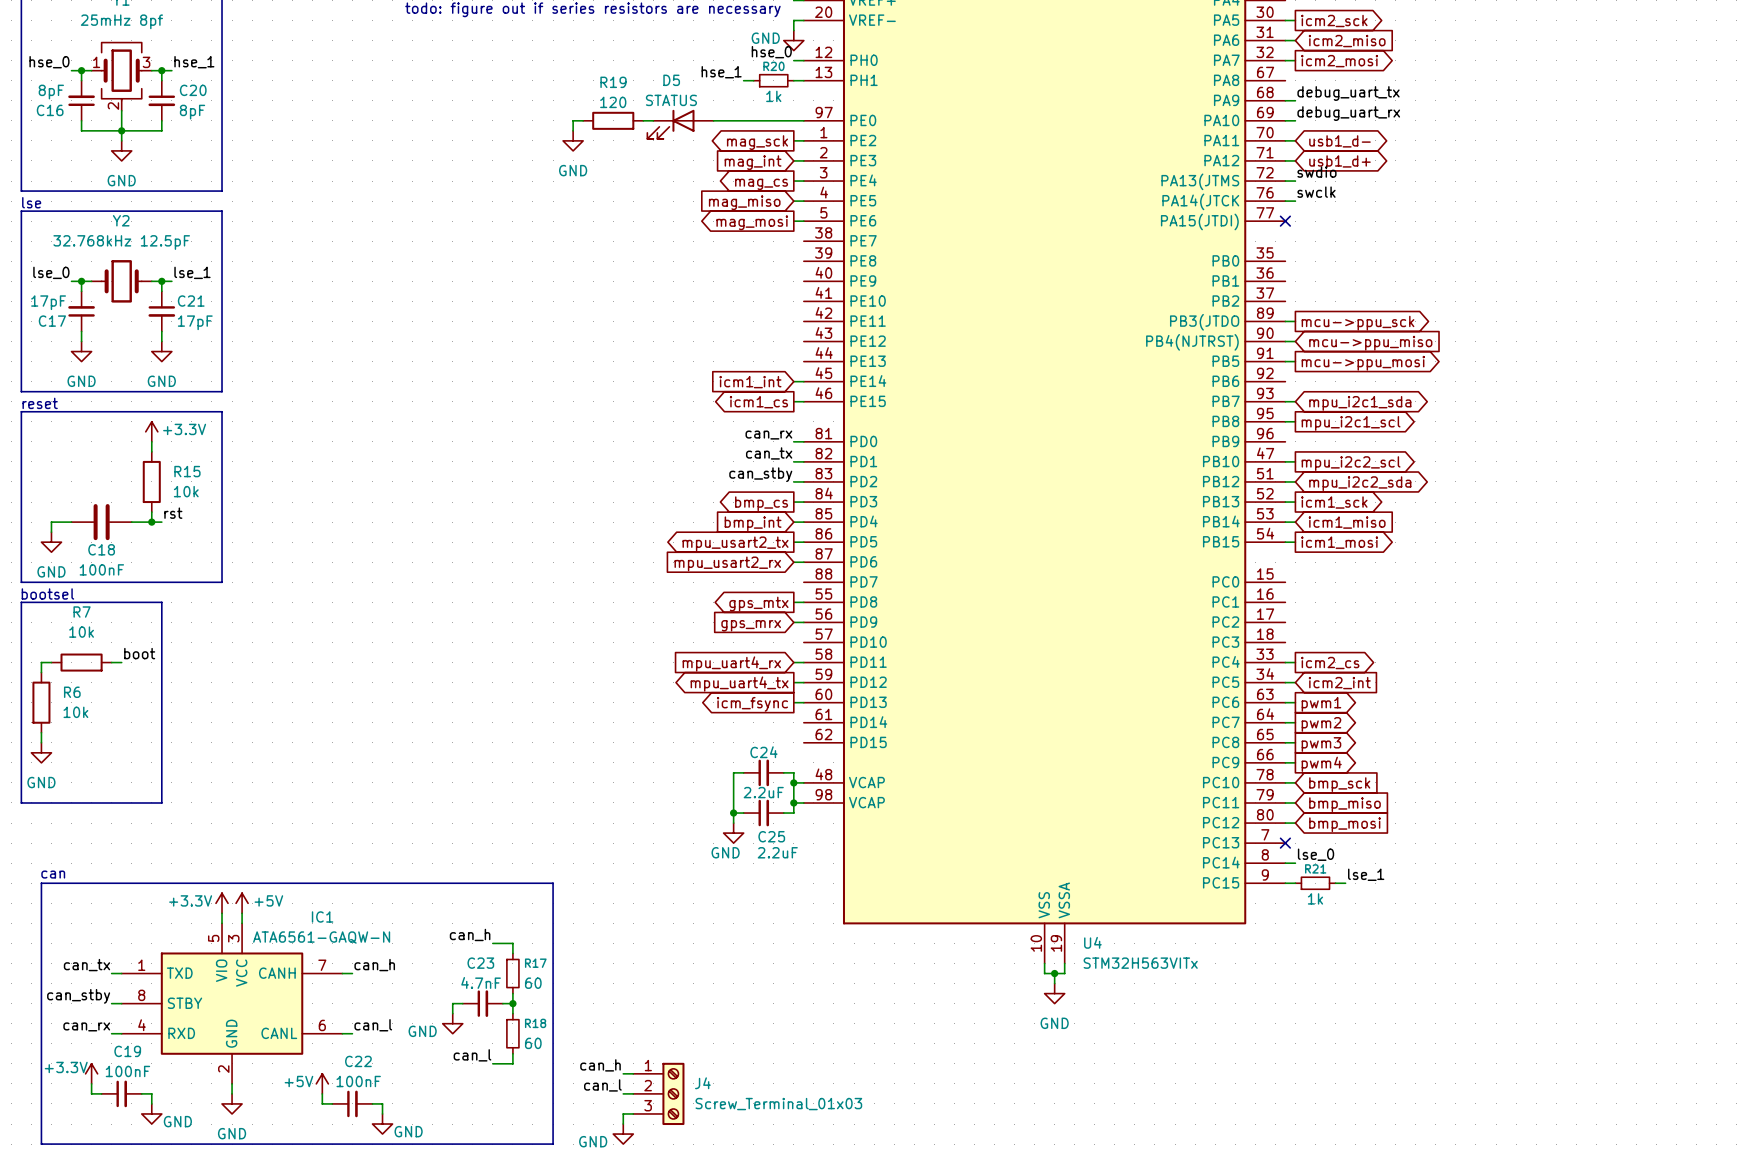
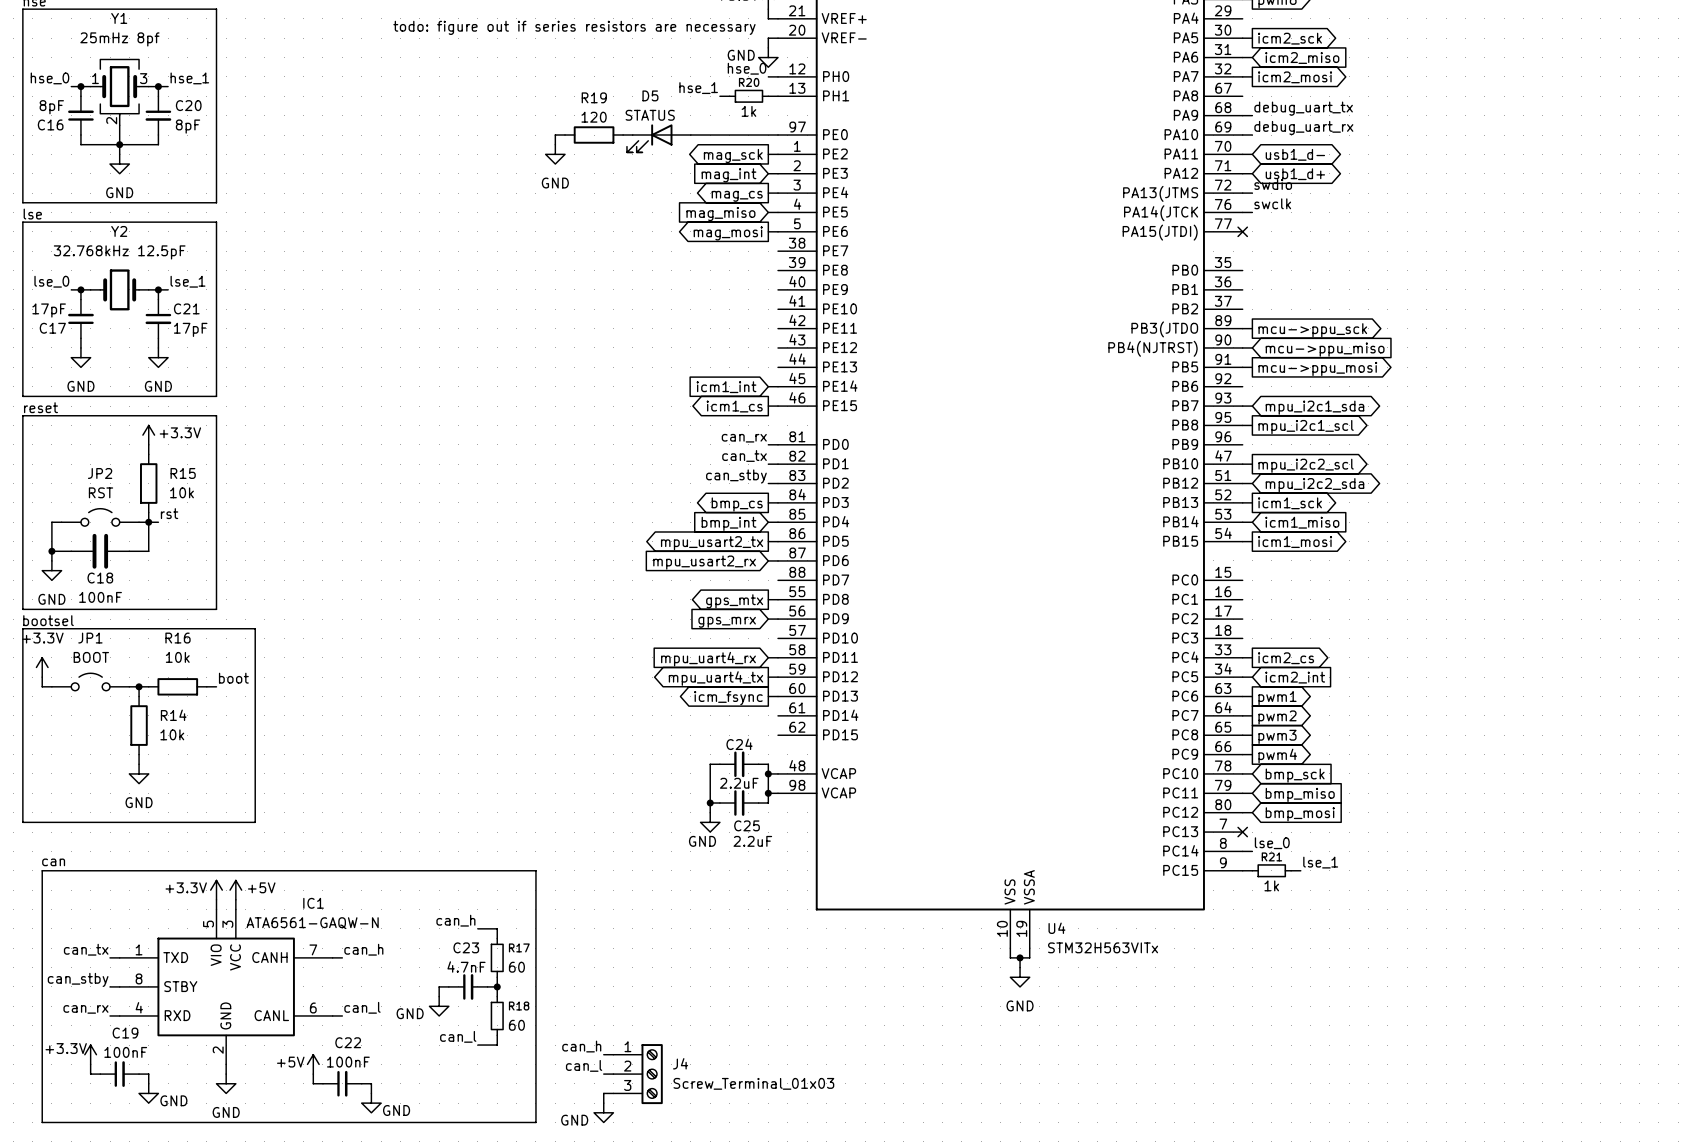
JP2: none -> RST (100, 517)
C18 position: (101, 522) -> (100, 551)
wire: none -> (148, 522) (148, 551) (129, 551)
wire: none -> (51, 531) (51, 560)
power symbol position: GND (51, 542) -> GND (51, 570)
wire: none -> (51, 551) (71, 551)
junction: none -> (51, 551)
line: (21, 582) (222, 582) -> (22, 609) (216, 609) (216, 580)
text position: bootsel (47, 593) -> bootsel (48, 620)
line: (21, 602) (161, 602) (161, 802) (21, 802) -> (22, 628) (255, 628) (255, 822) (22, 822) (22, 793)
line: (21, 612) (21, 632) -> (22, 580) (22, 599)
label position: boot (139, 653) -> boot (233, 678)
R7: 10k (81, 662) -> none
wire: (111, 662) (121, 662) -> (206, 686) (216, 686)
power symbol: none -> +3.3V (42, 667)
wire: none -> (42, 677) (42, 686) (51, 686)
JP1: none -> BOOT (90, 681)
wire: none -> (129, 686) (148, 686)
wire: none -> (139, 686) (139, 696)
junction: none -> (139, 686)
R16: none -> 10k (177, 686)
R6: 10k (41, 702) -> none
wire: (41, 732) (41, 742) -> (139, 754) (139, 764)
R14: none -> 10k (139, 725)
power symbol: GND (41, 752) -> none
power symbol: none -> GND (139, 773)

